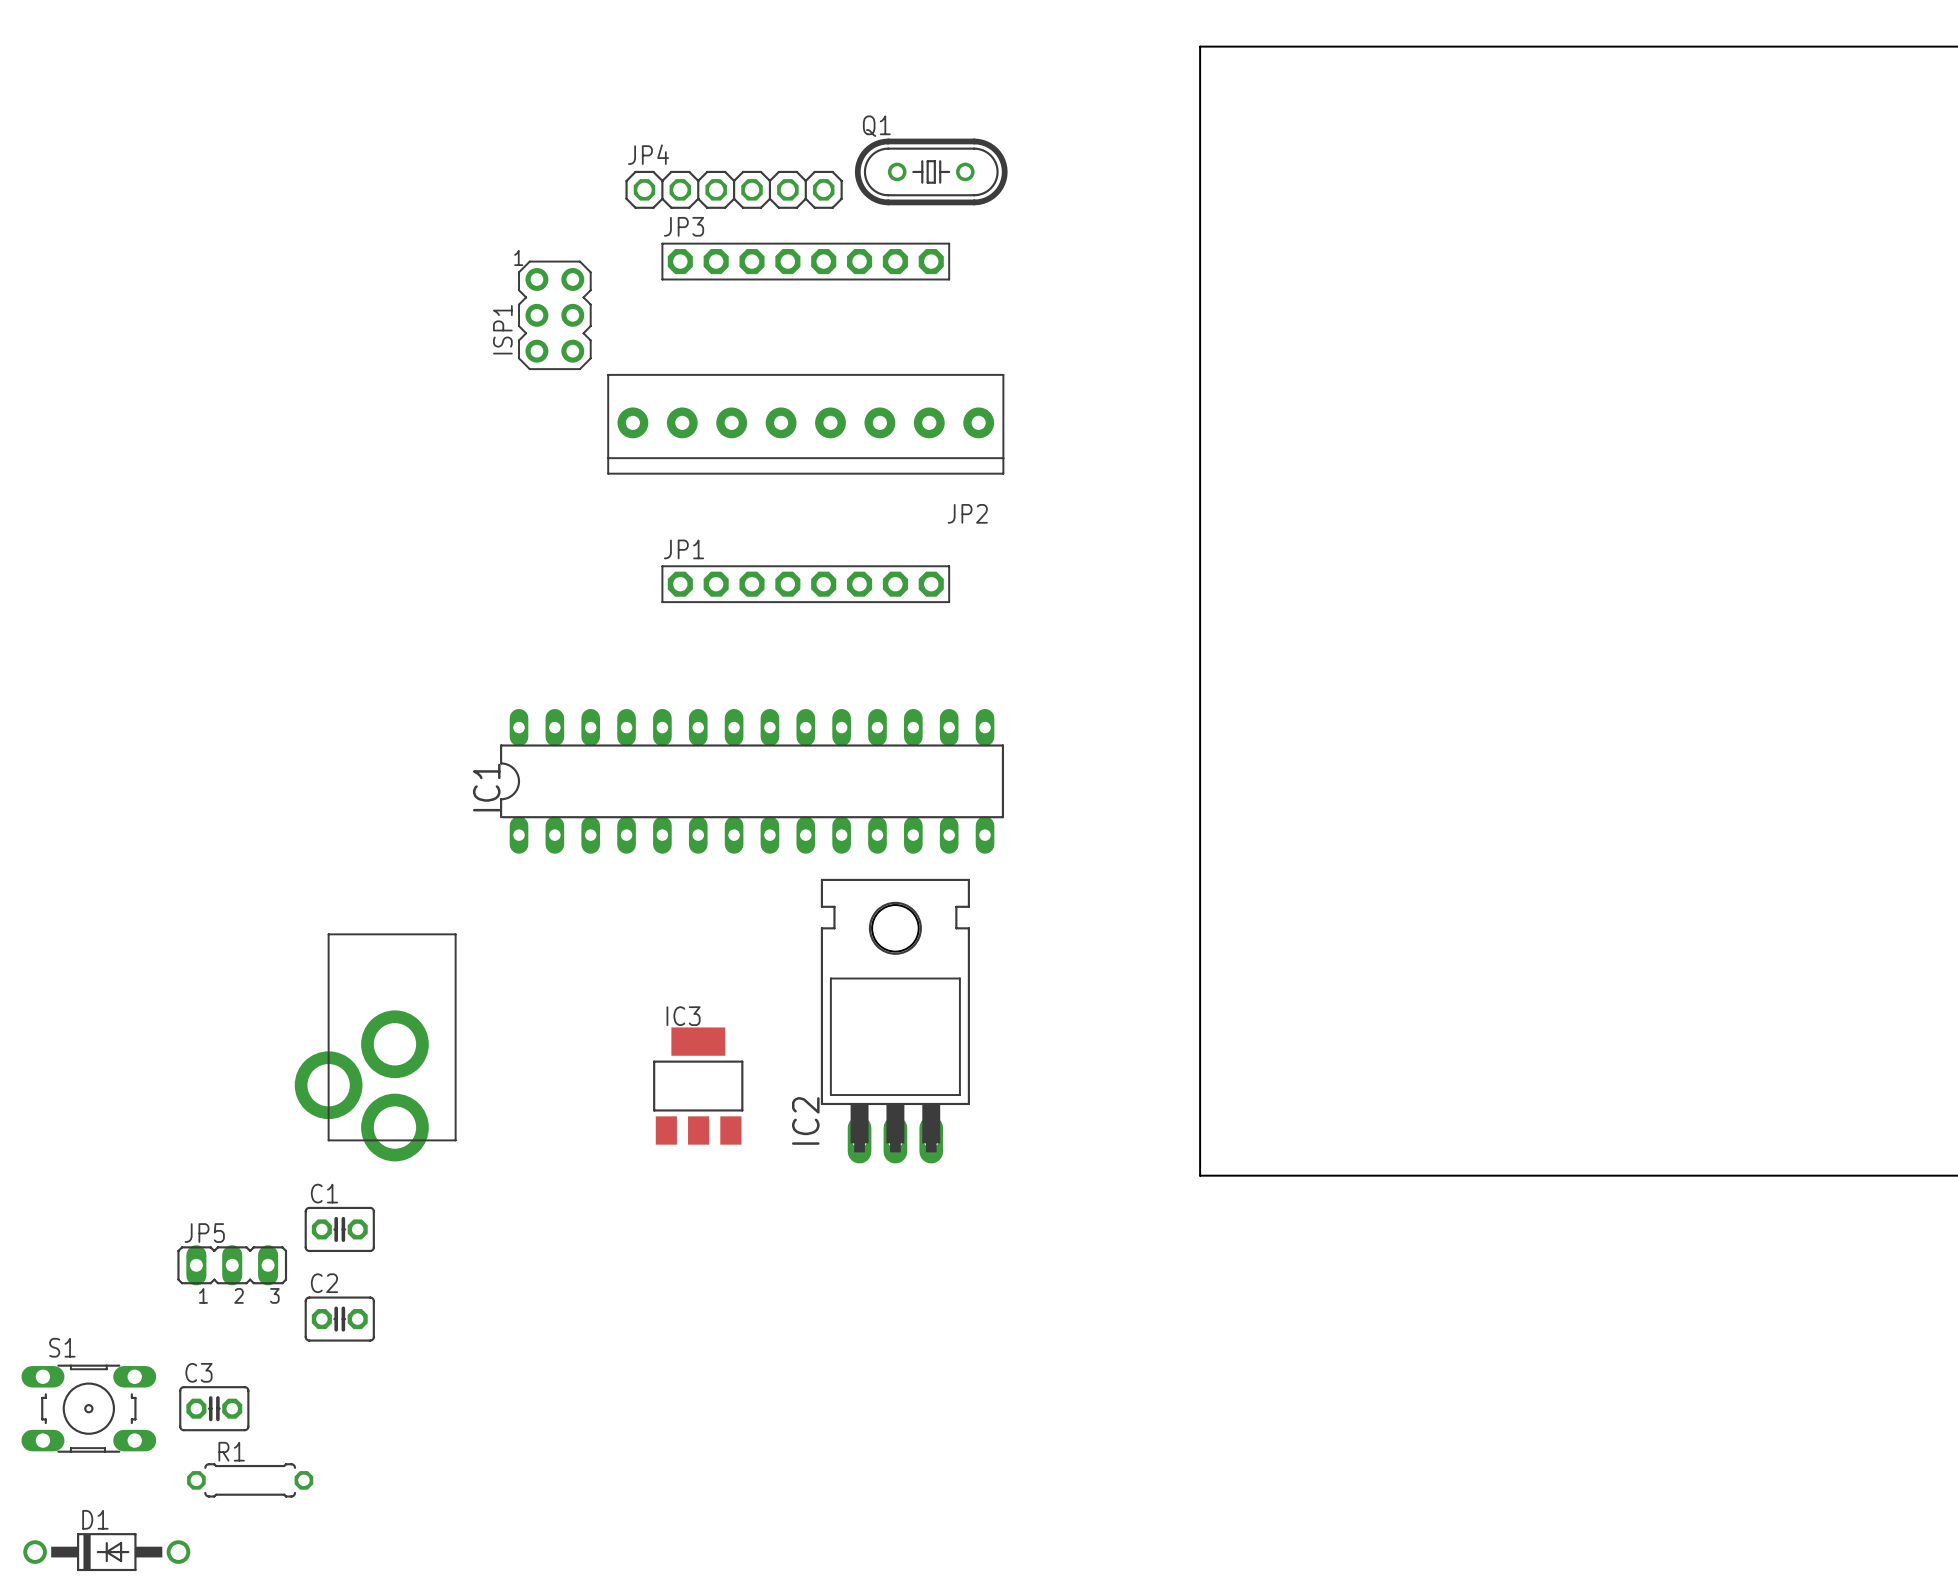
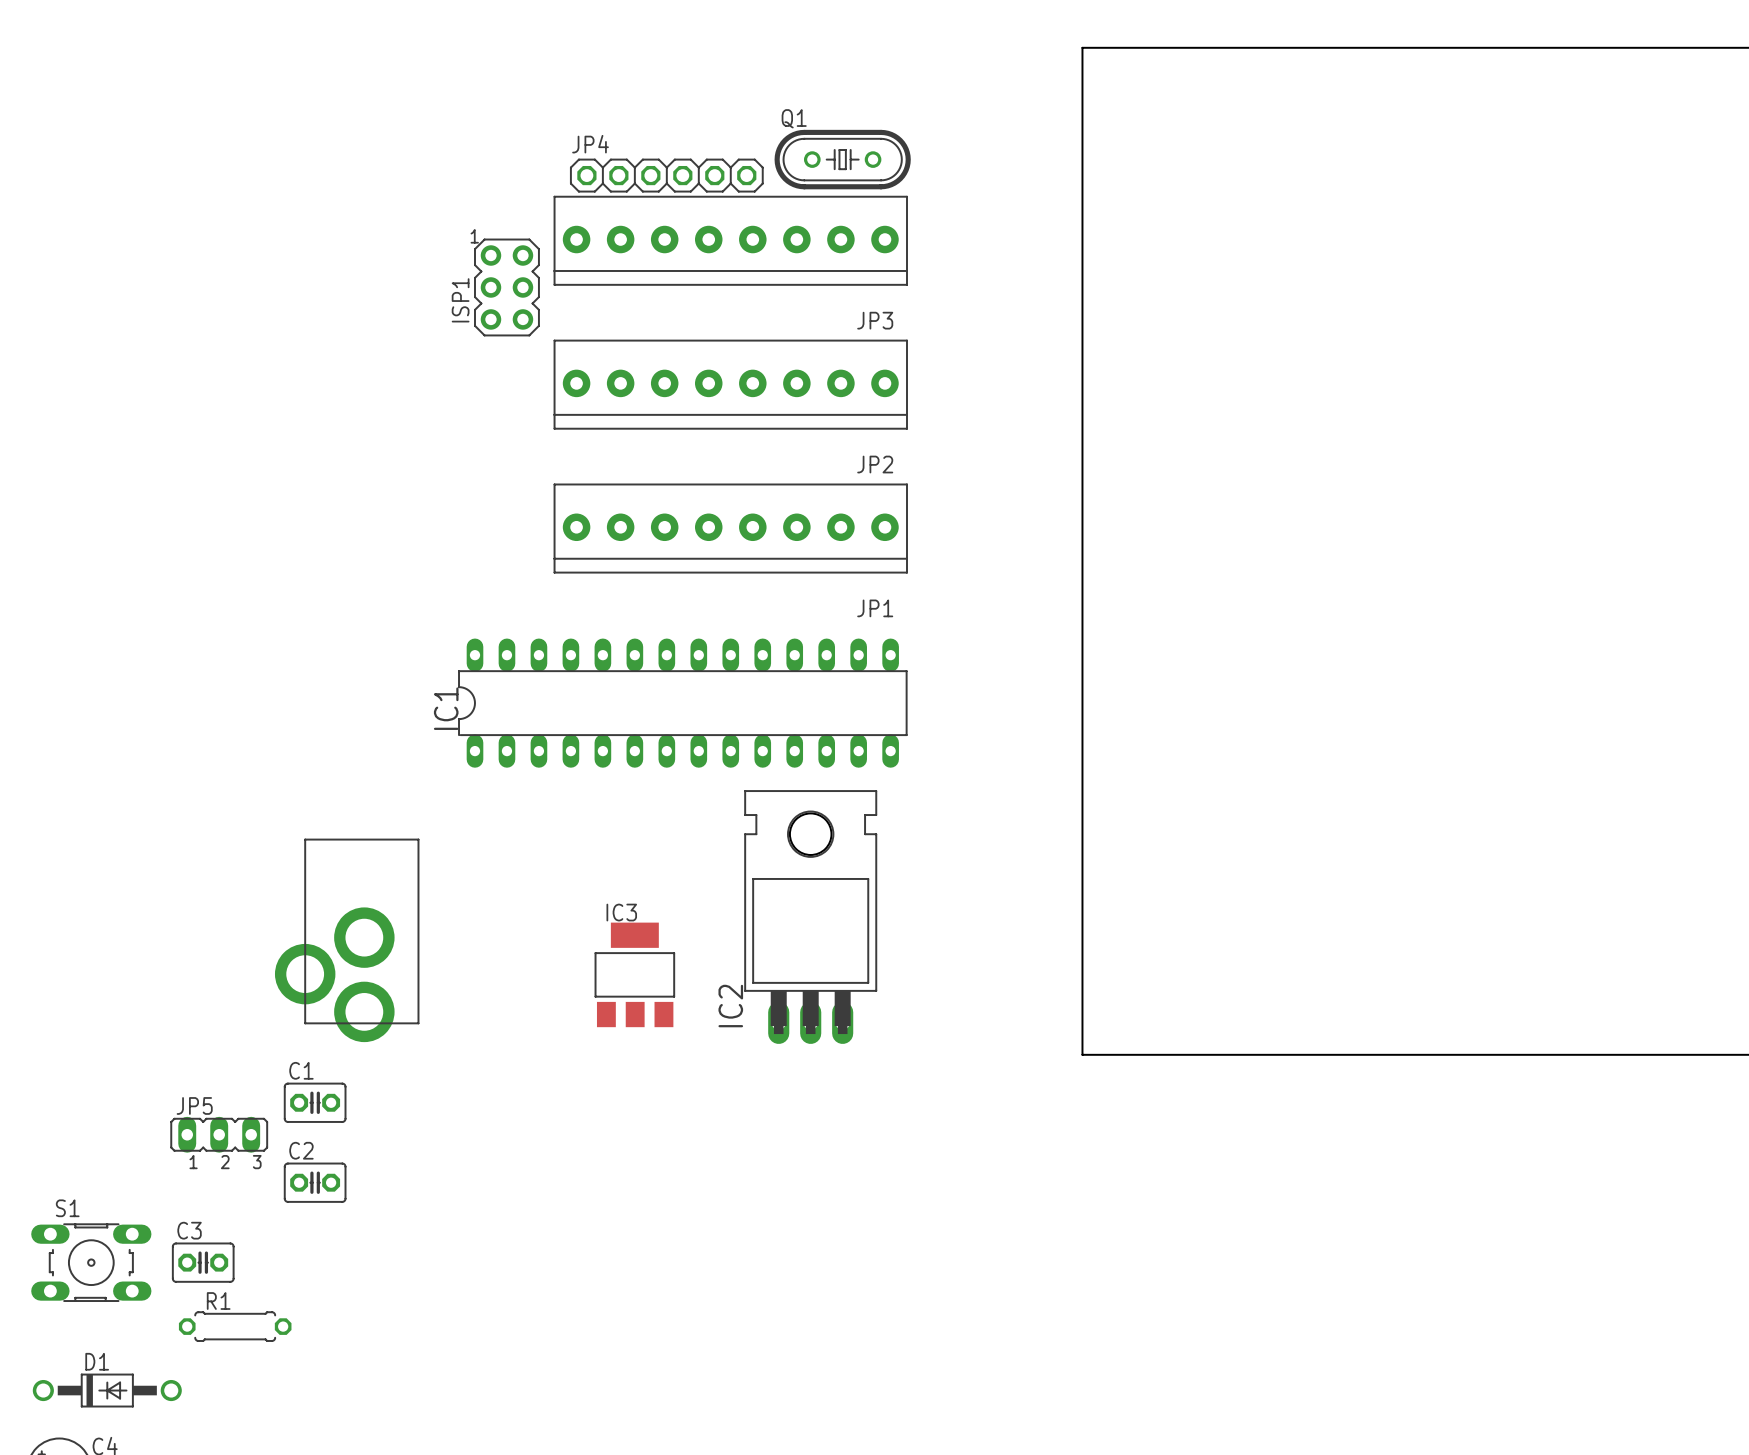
JP3 name position: JP3 (684, 226) -> JP3 (875, 320)
JP3 footprint: [661, 242, 951, 281] -> [553, 195, 908, 286]
JP1 name position: JP1 (684, 549) -> JP1 (875, 608)
JP1 footprint: [661, 565, 951, 604] -> [553, 483, 908, 574]

